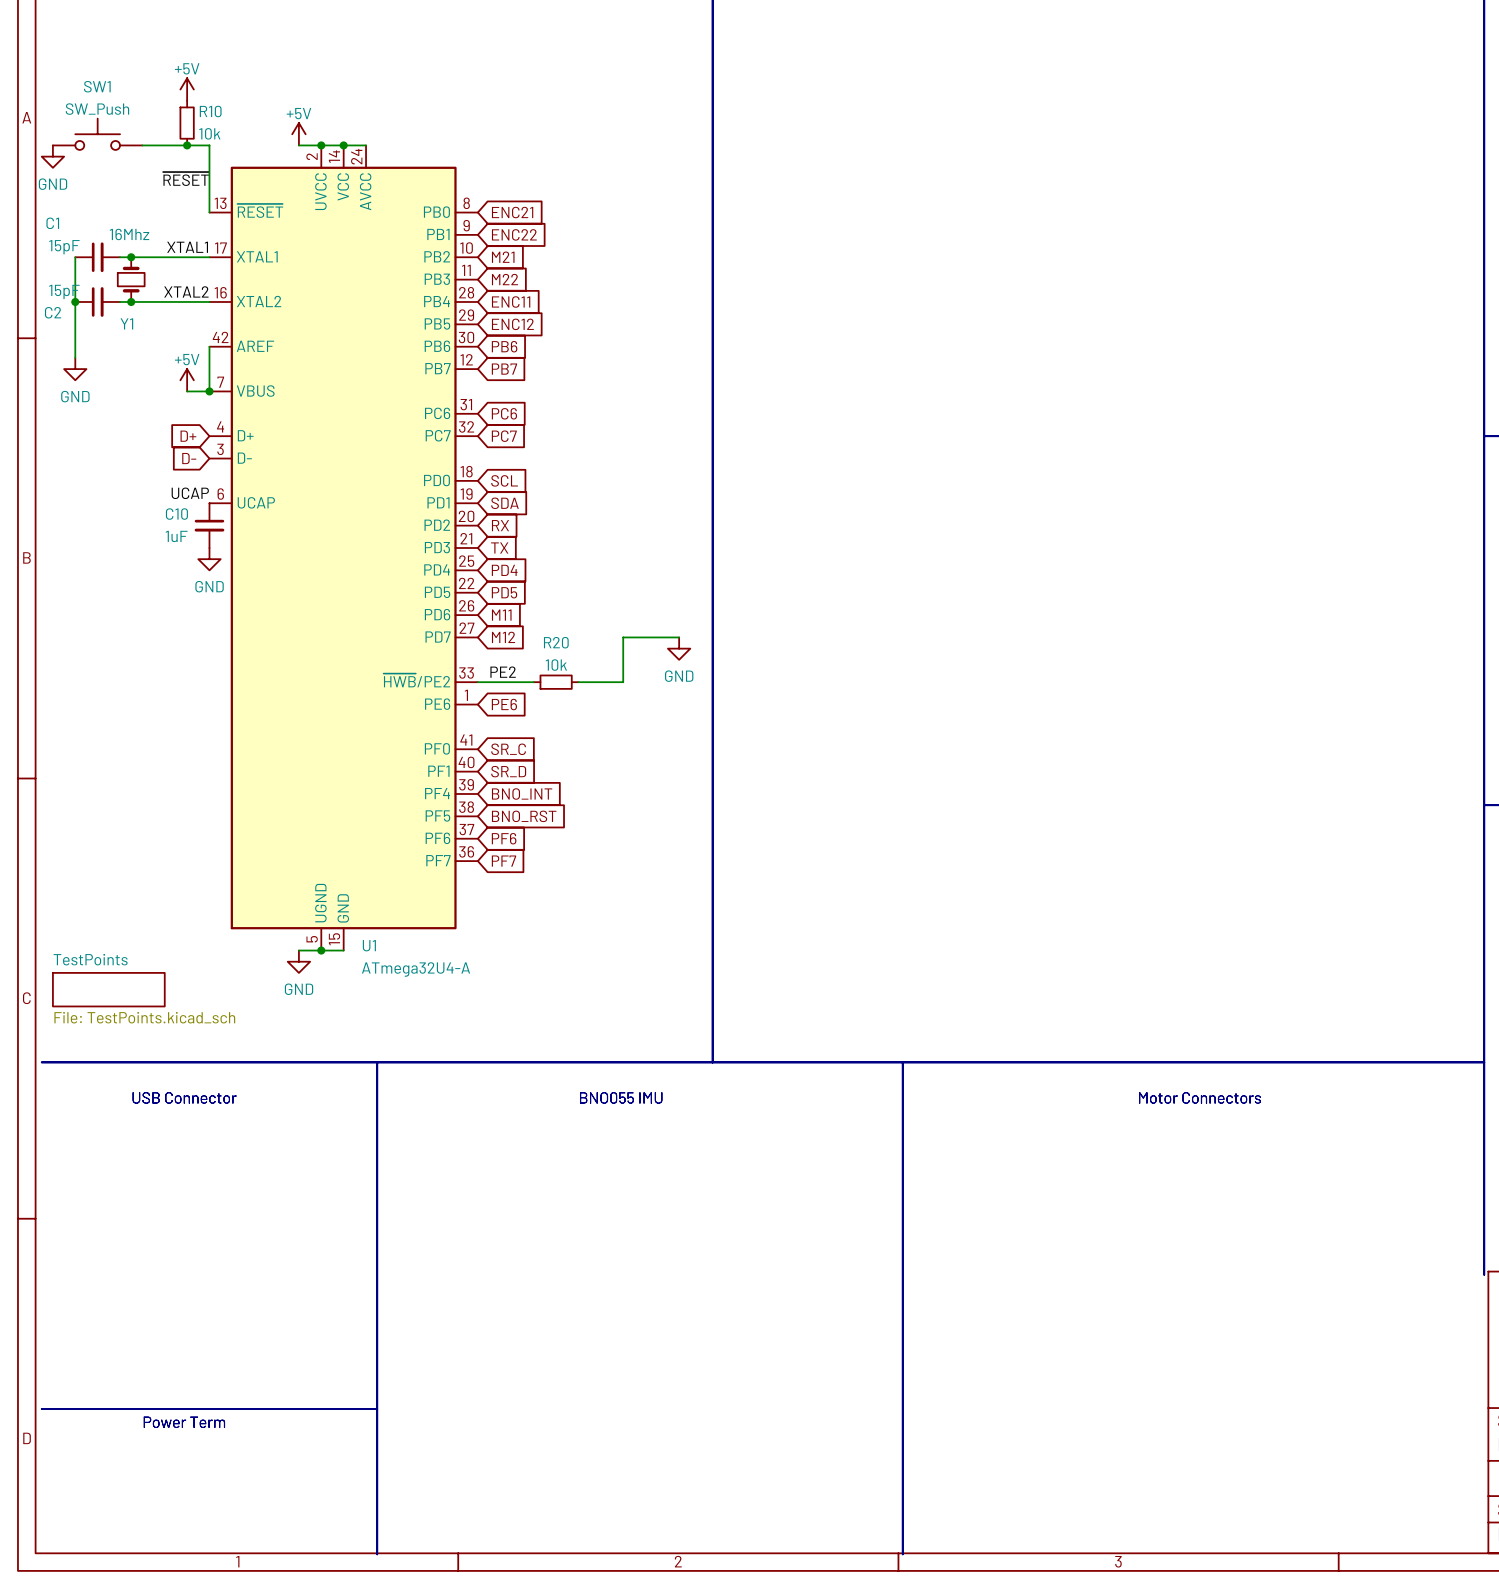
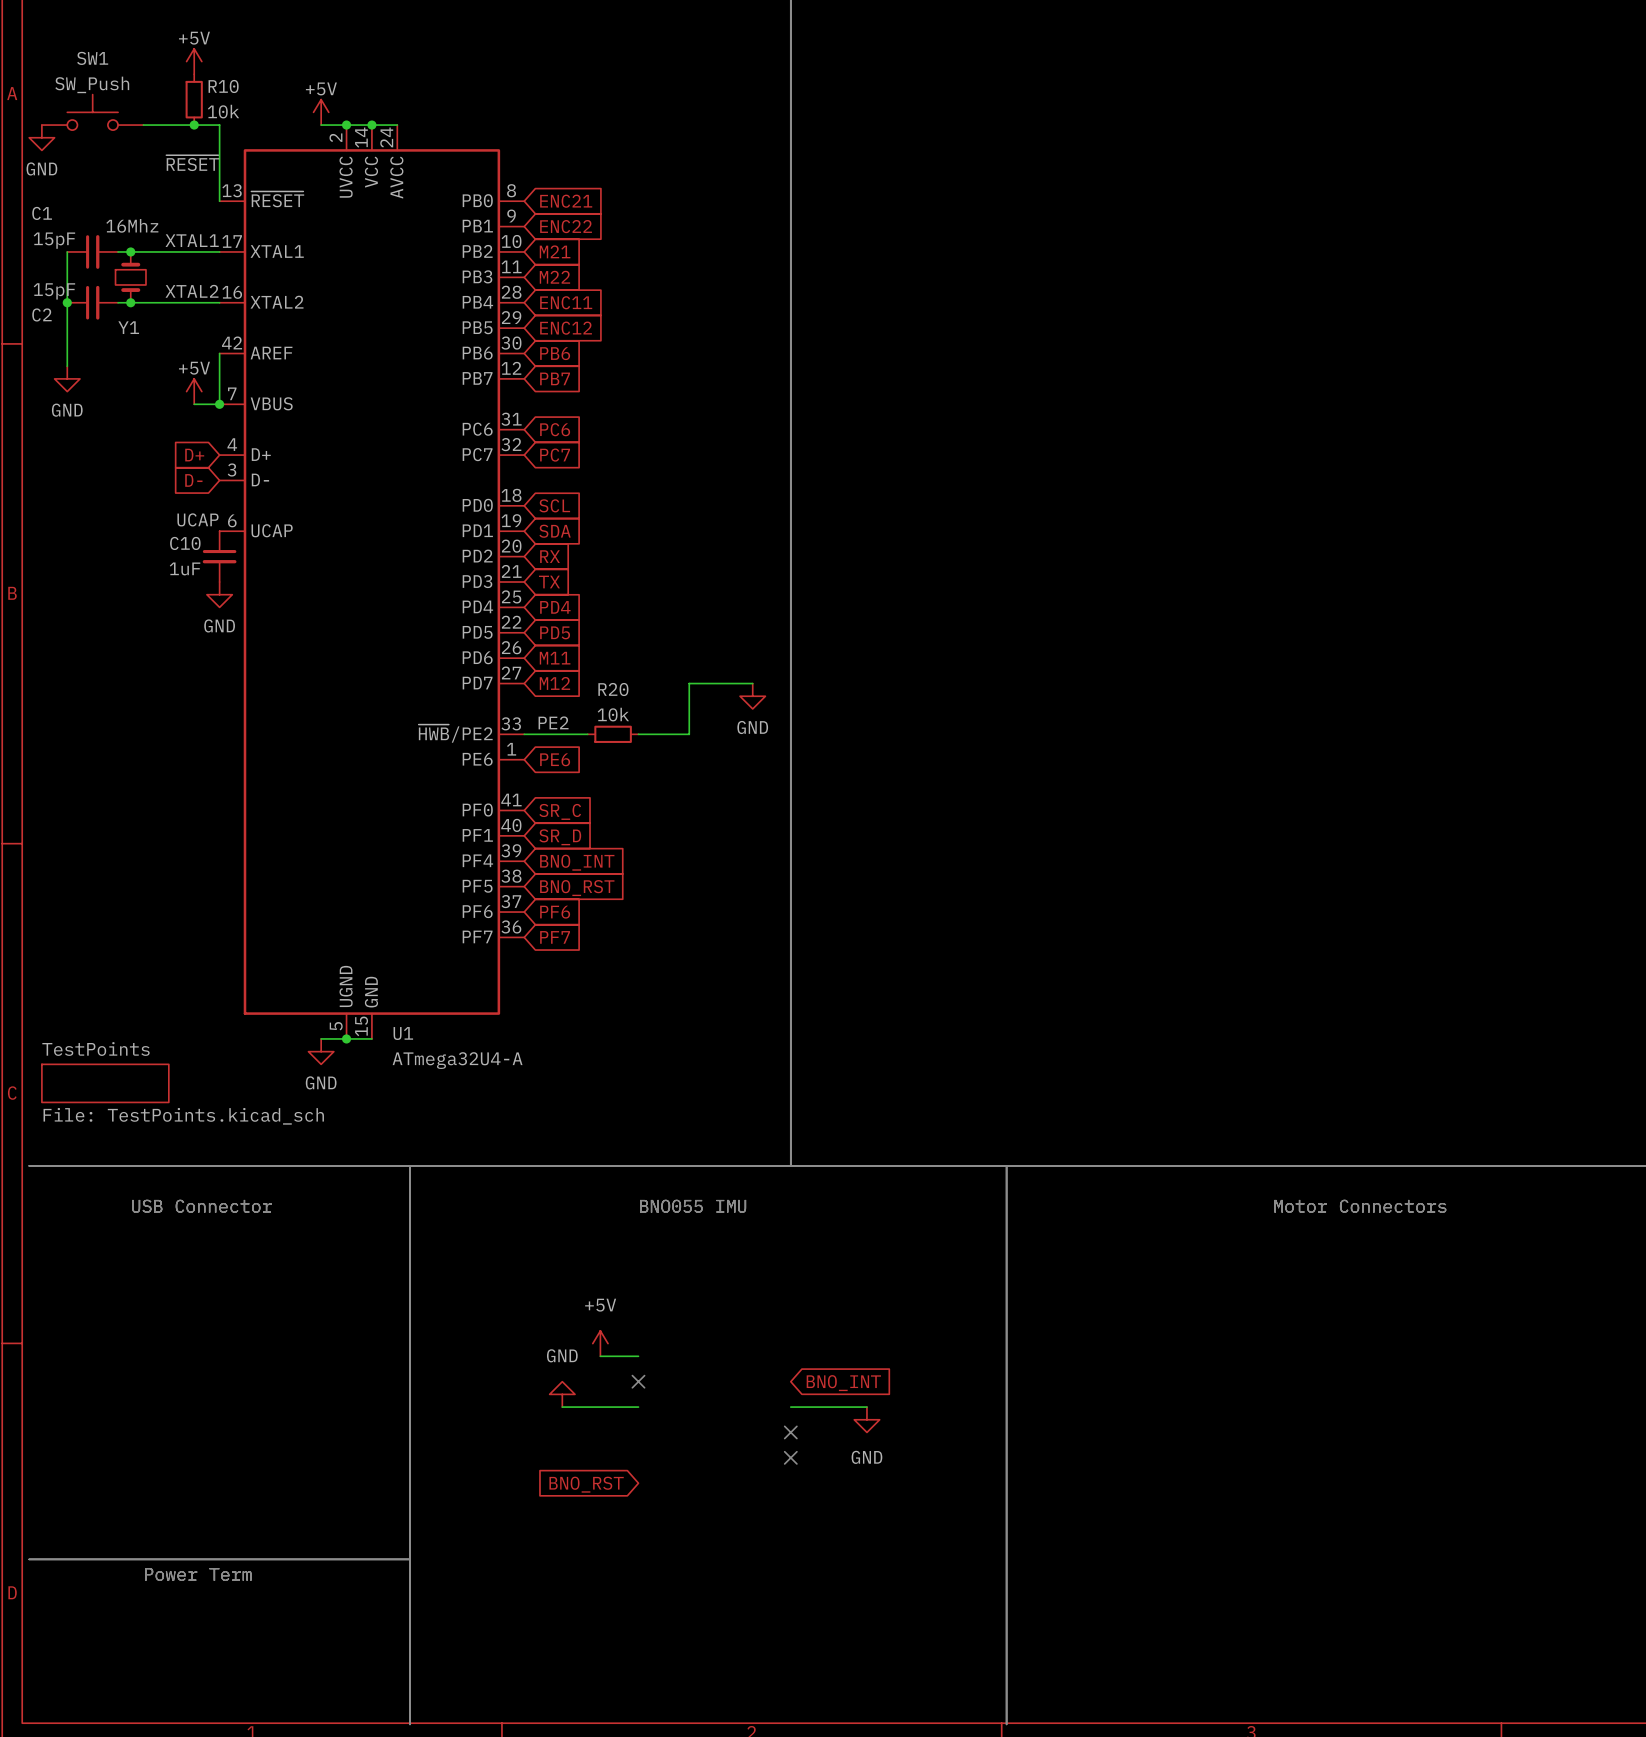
power symbol: none -> +5V (600, 1343)
wire: none -> (600, 1356) (638, 1356)
no-connect mark: none -> (638, 1381)
global label: none -> BNO_INT (843, 1383)
power symbol: none -> GND (562, 1394)
wire: none -> (562, 1407) (638, 1407)
wire: none -> (790, 1407) (866, 1407)
power symbol: none -> GND (866, 1419)
no-connect mark: none -> (790, 1432)
no-connect mark: none -> (790, 1457)
global label: none -> BNO_RST (586, 1484)

